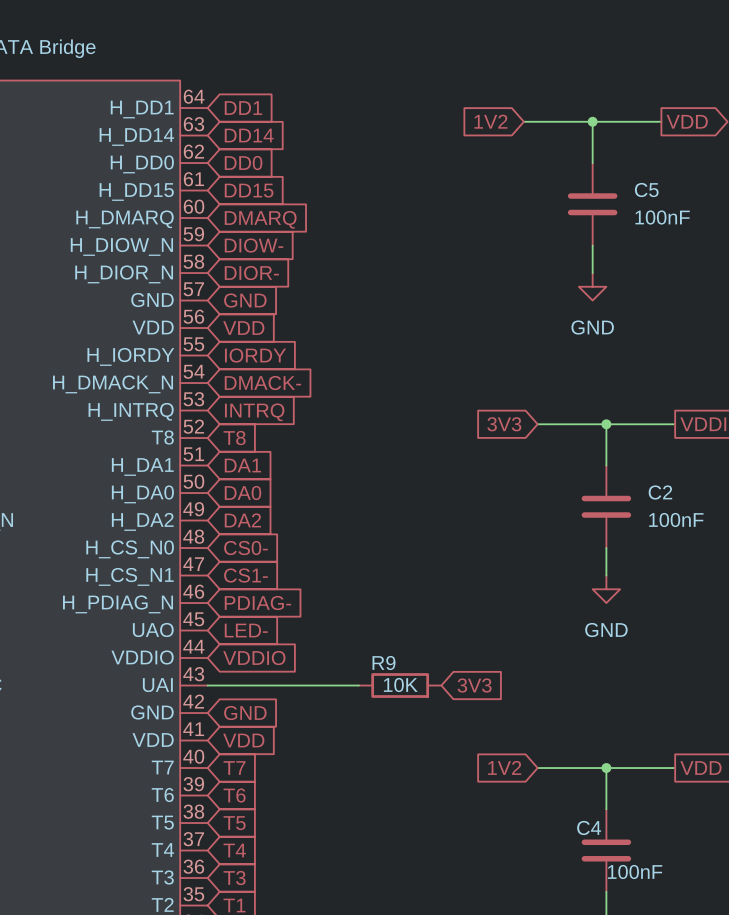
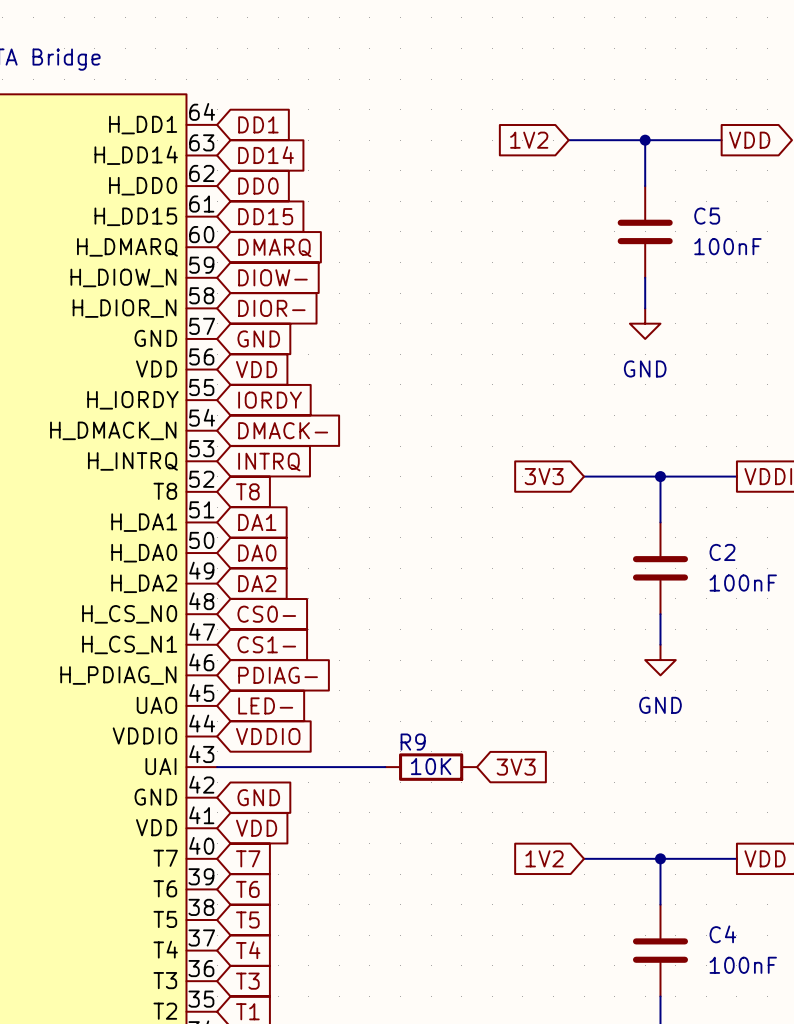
C4 name position: C4 (589, 828) -> C4 (722, 934)
C4 value position: 100nF (635, 872) -> 100nF (743, 965)

